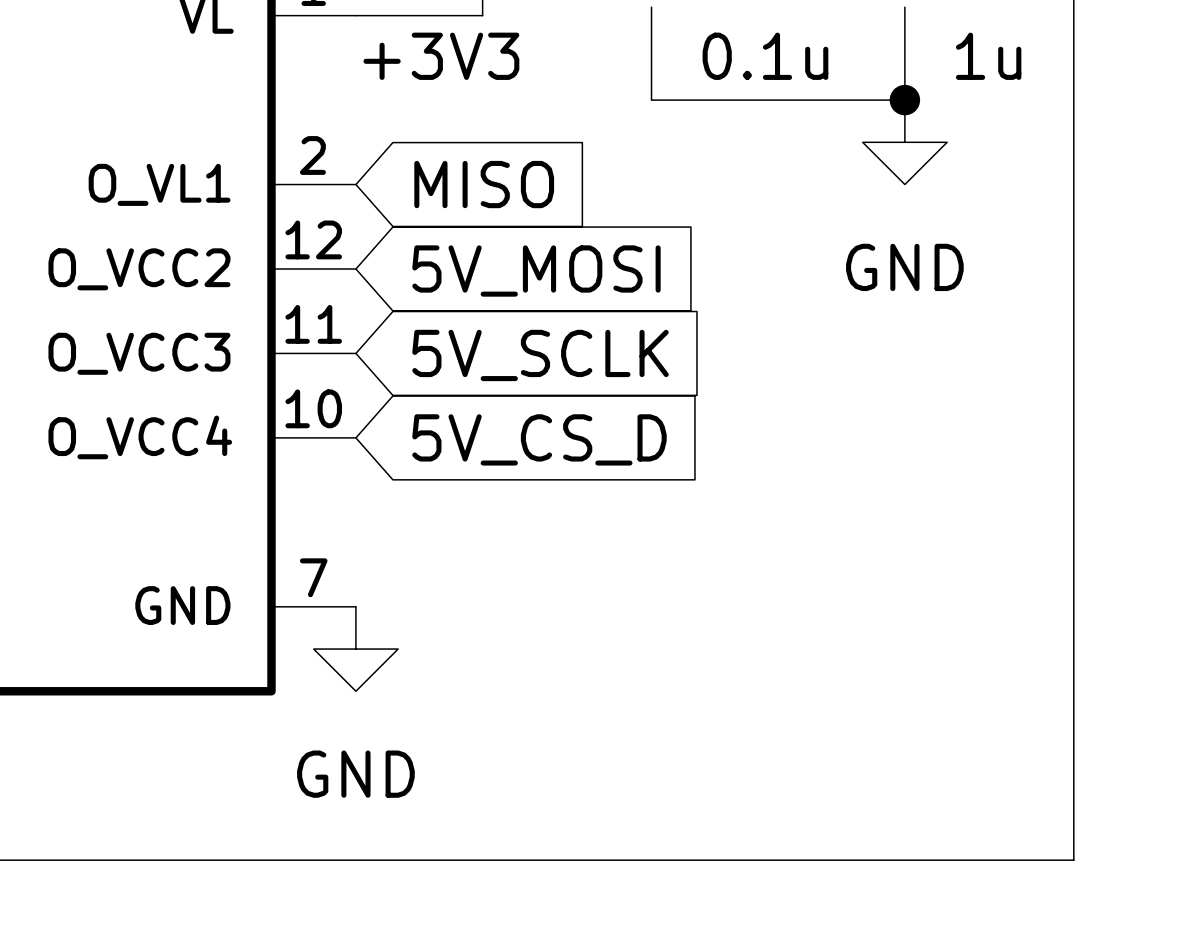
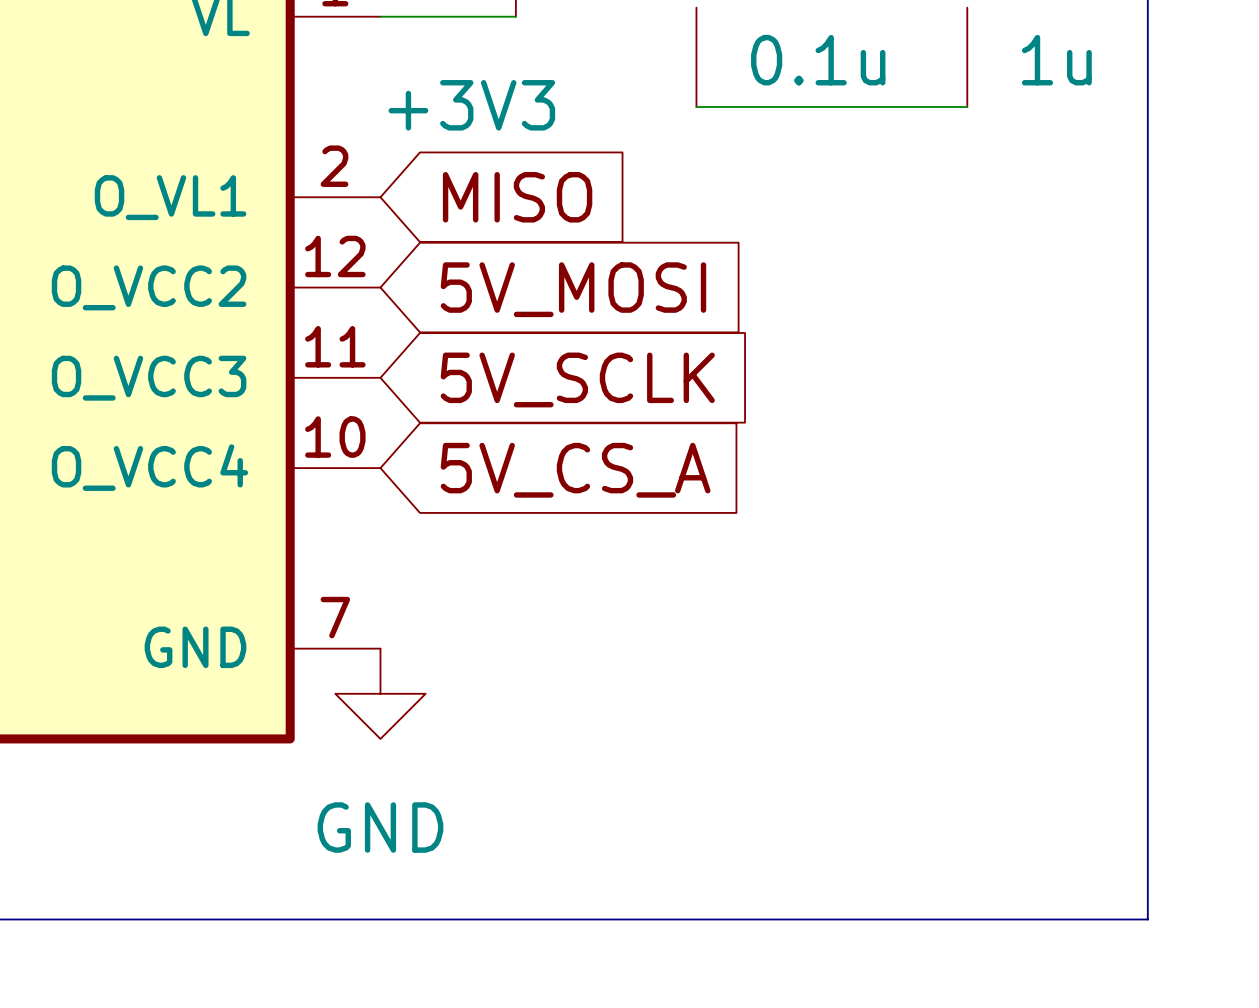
power symbol text position: +3V3 (441, 56) -> +3V3 (471, 105)
junction: (904, 100) -> none
power symbol: GND (904, 142) -> none
global label: 5V_CS_D (539, 439) -> 5V_CS_A (575, 470)

